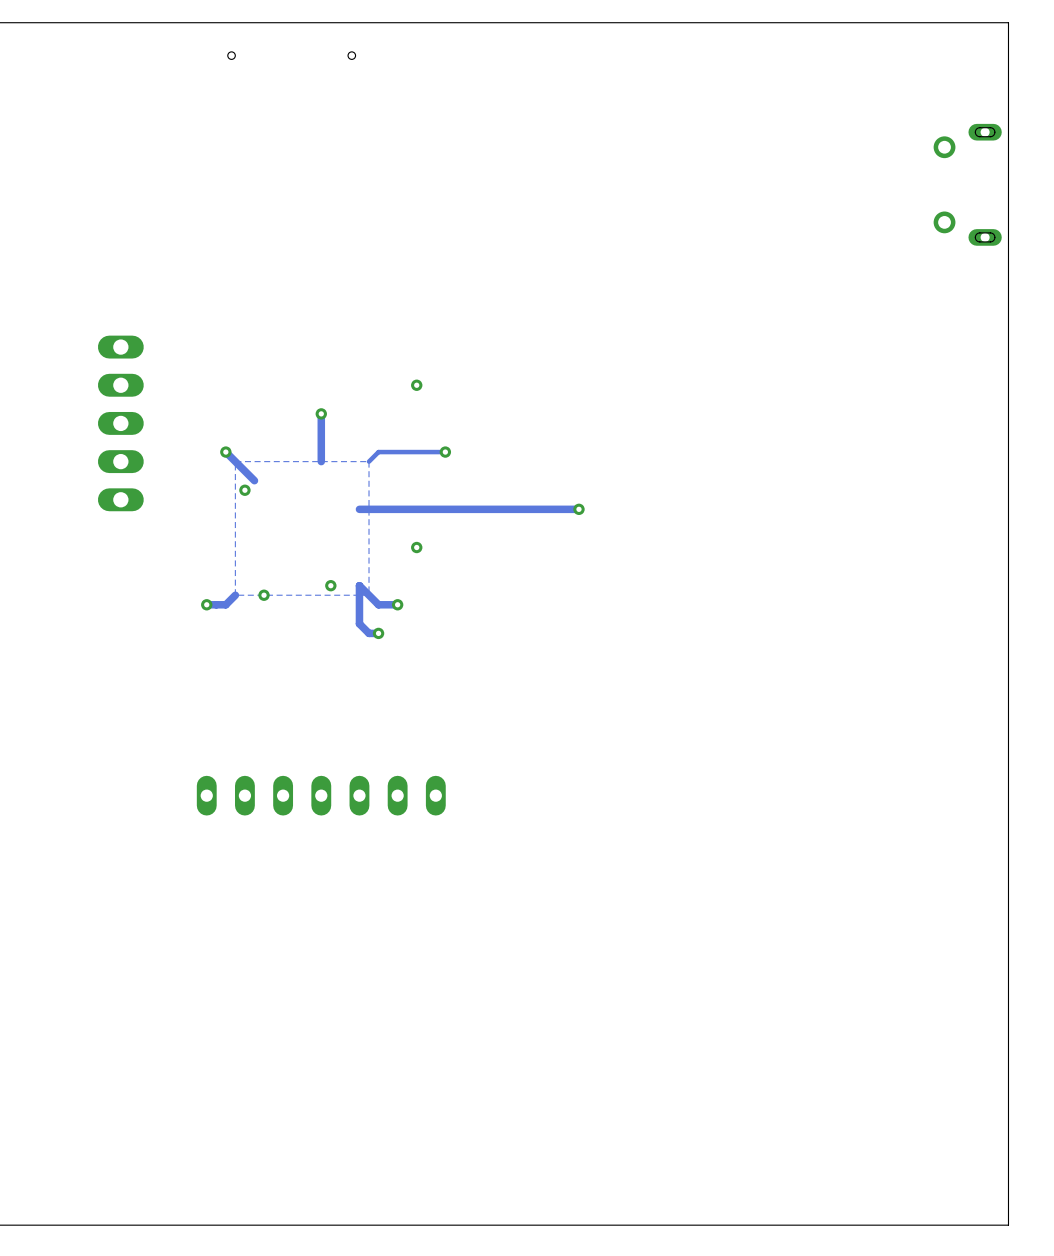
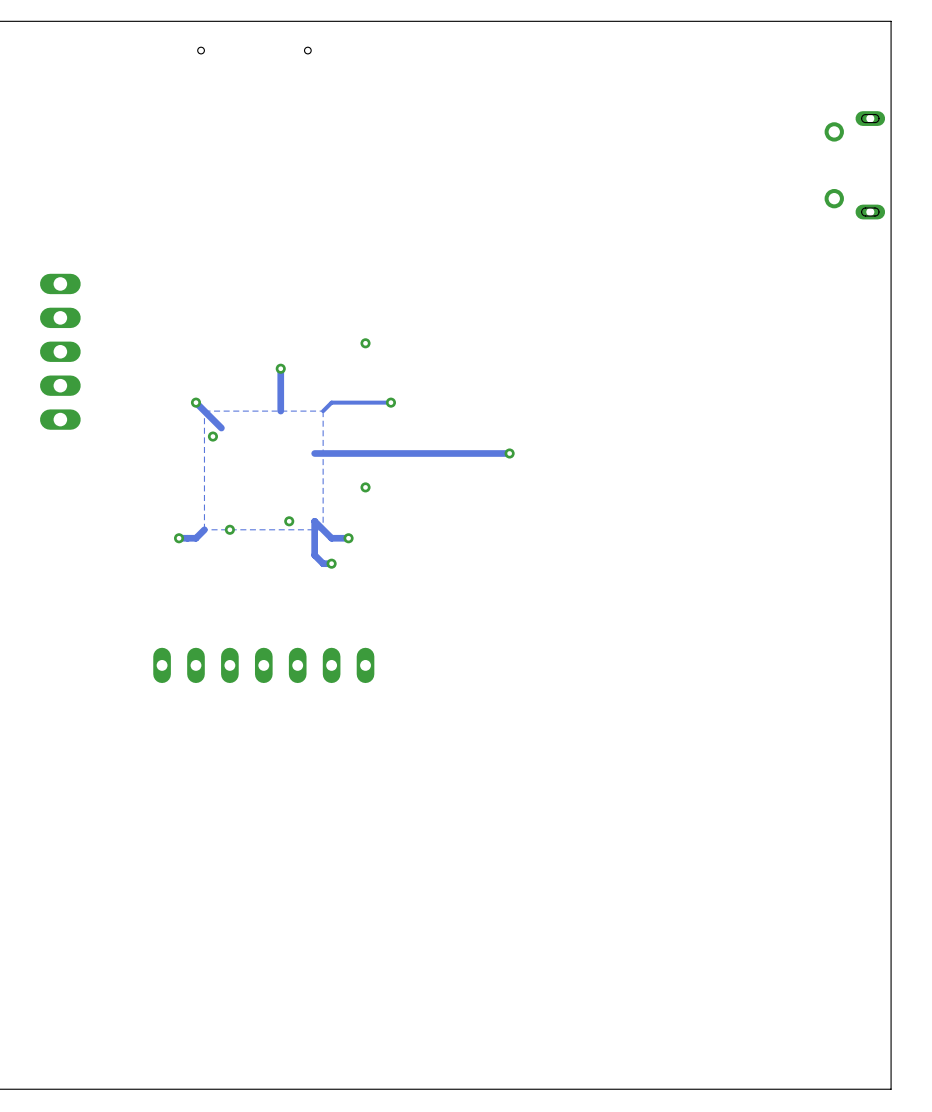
part position: (120, 423) -> (60, 351)
part position: (321, 795) -> (263, 665)

